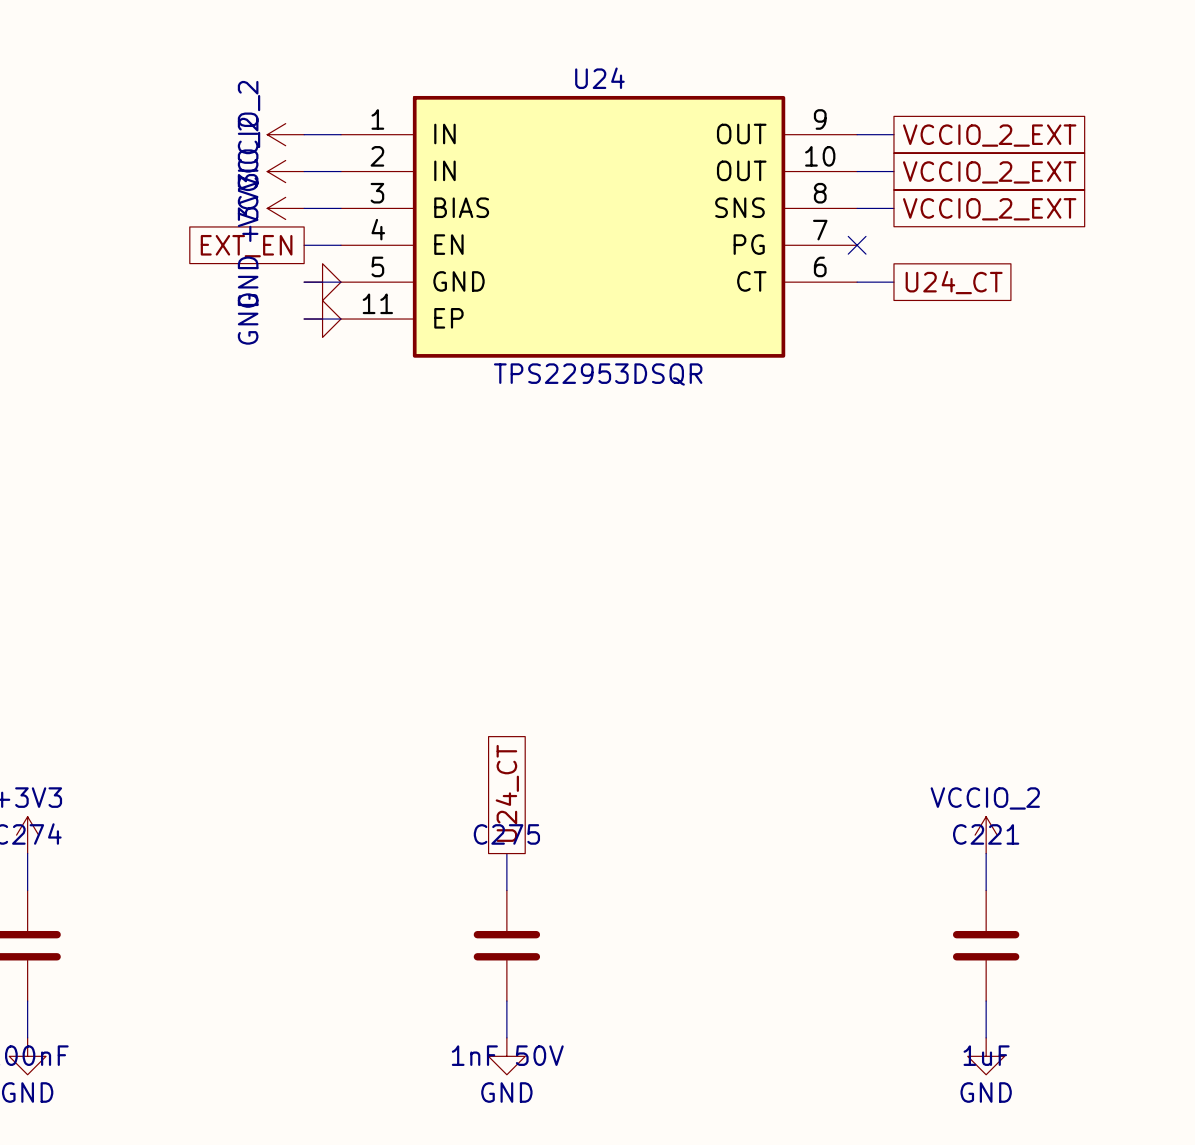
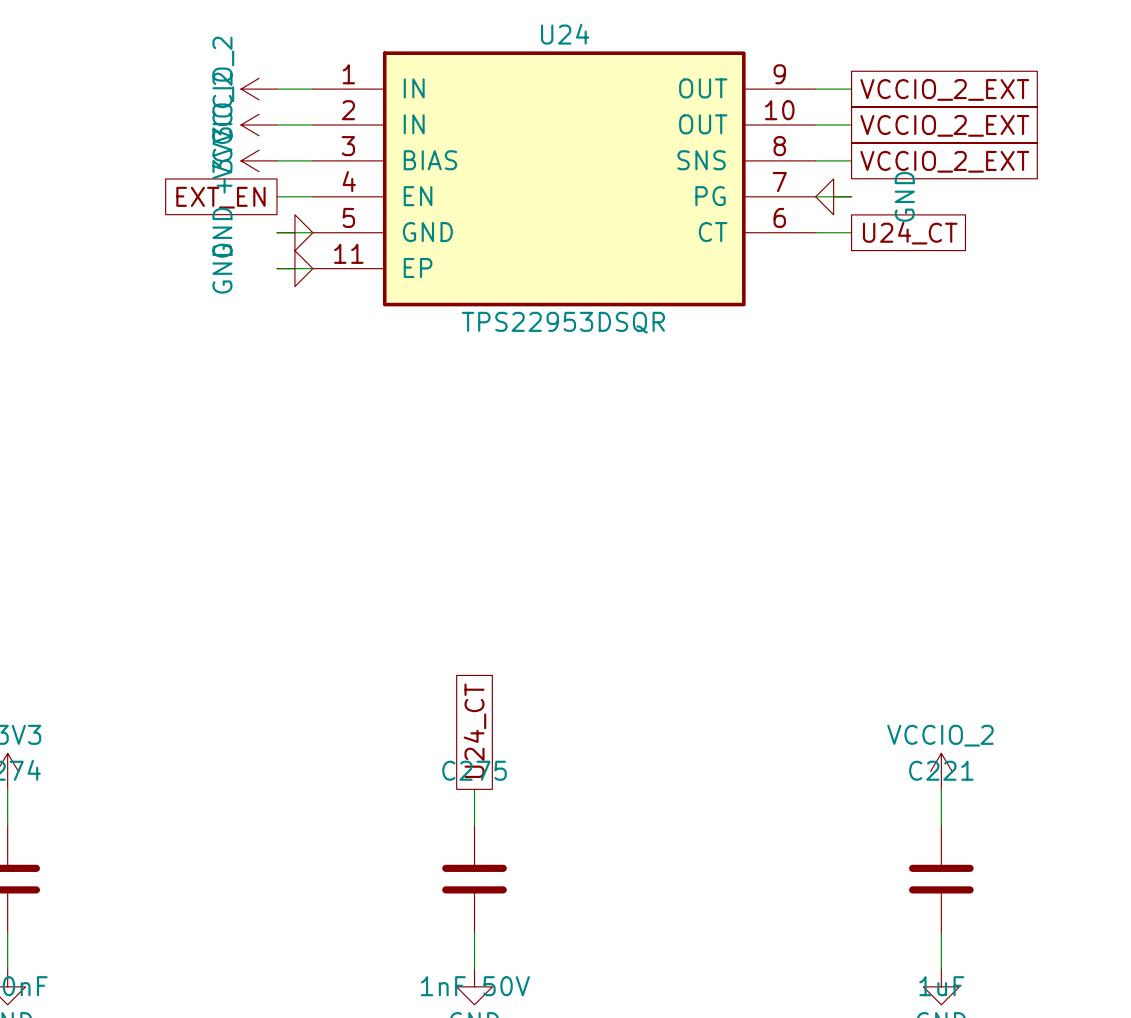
wire: none -> (815, 196) (851, 196)
no-connect mark: (857, 245) -> none
power symbol: none -> GND (833, 196)

